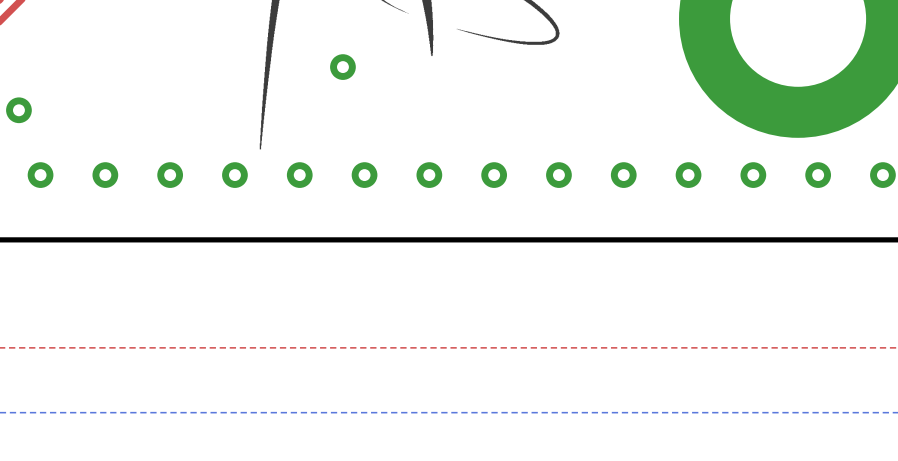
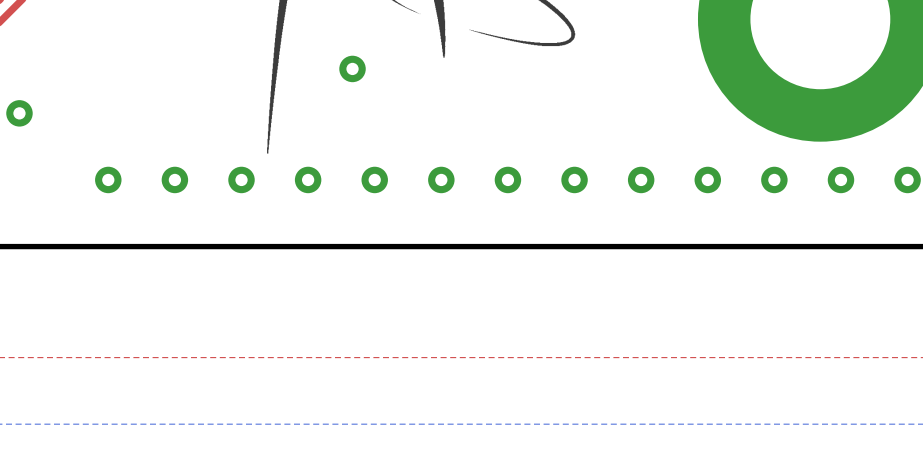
via: (40, 175) -> none

